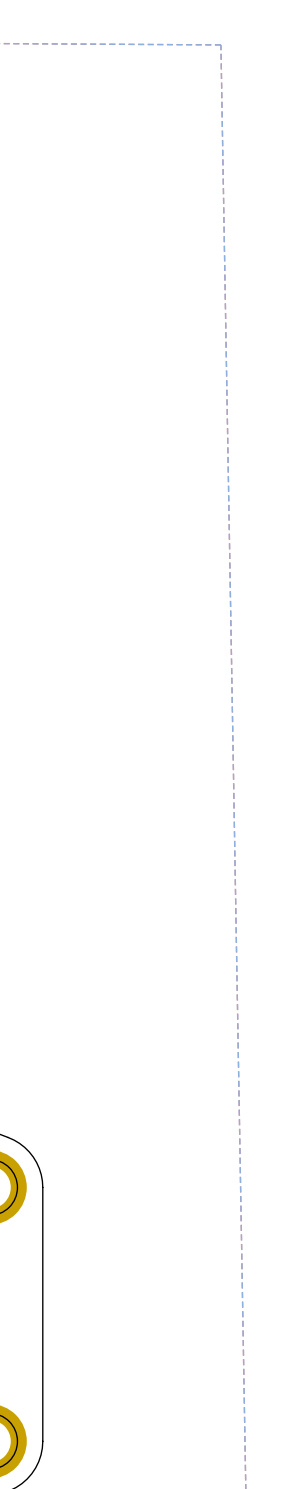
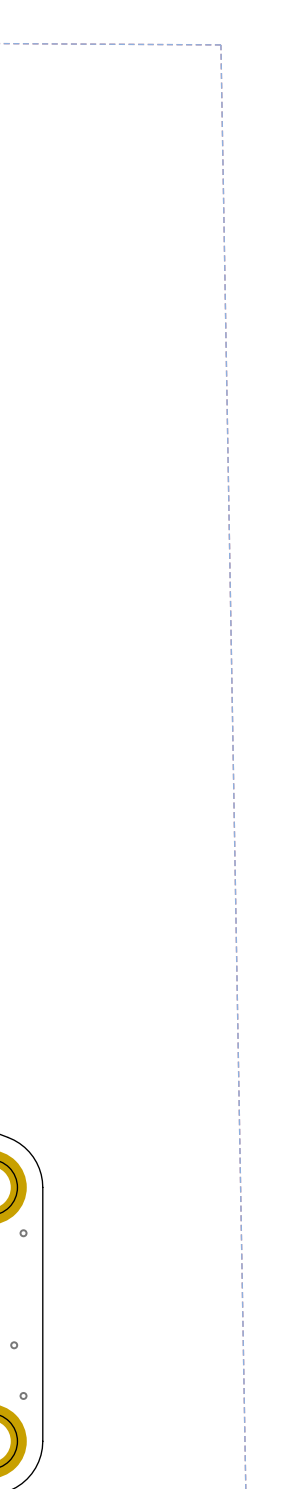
via: none -> (23, 1233)
via: none -> (14, 1345)
via: none -> (23, 1395)

